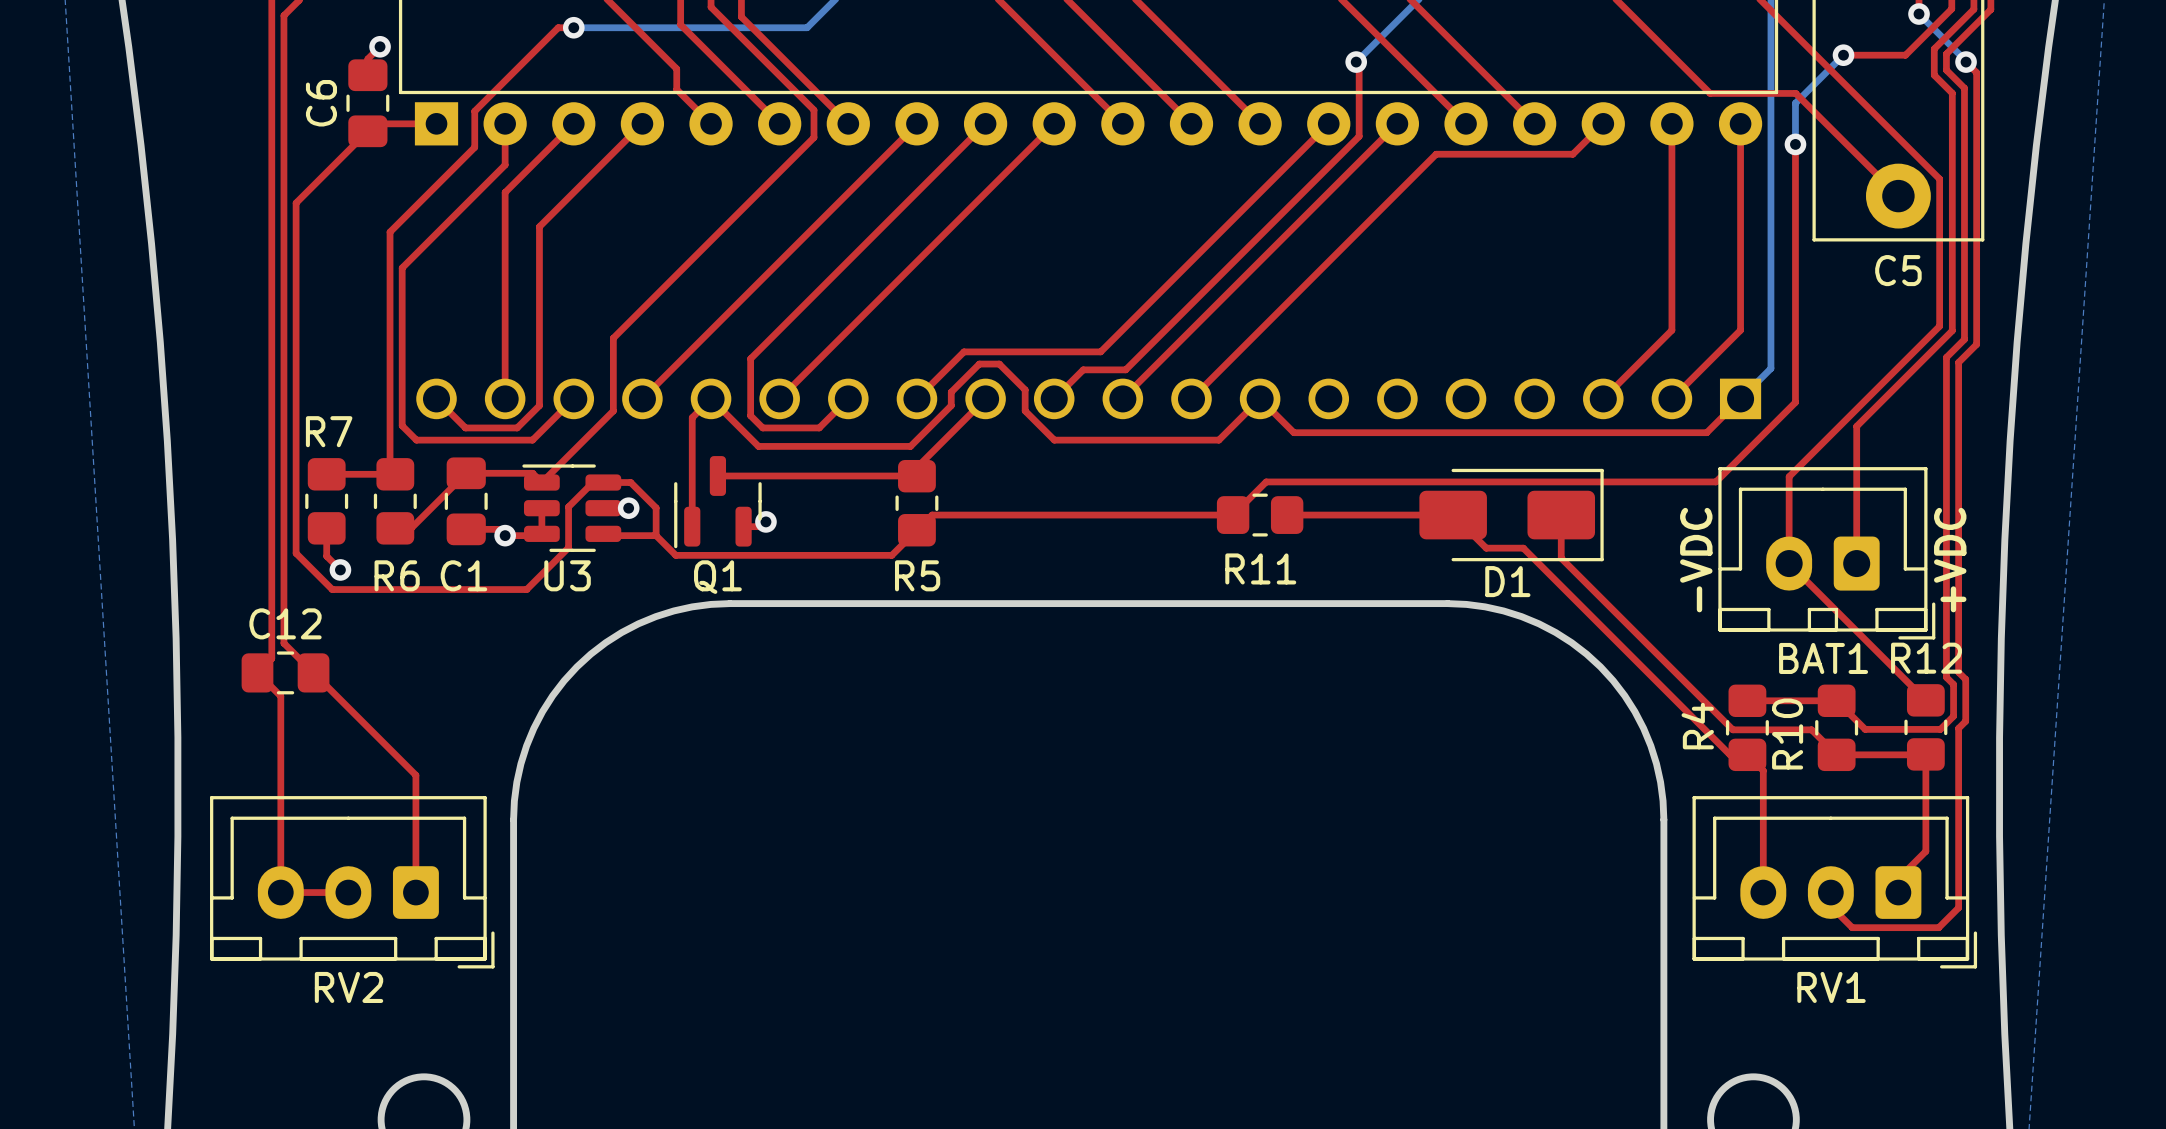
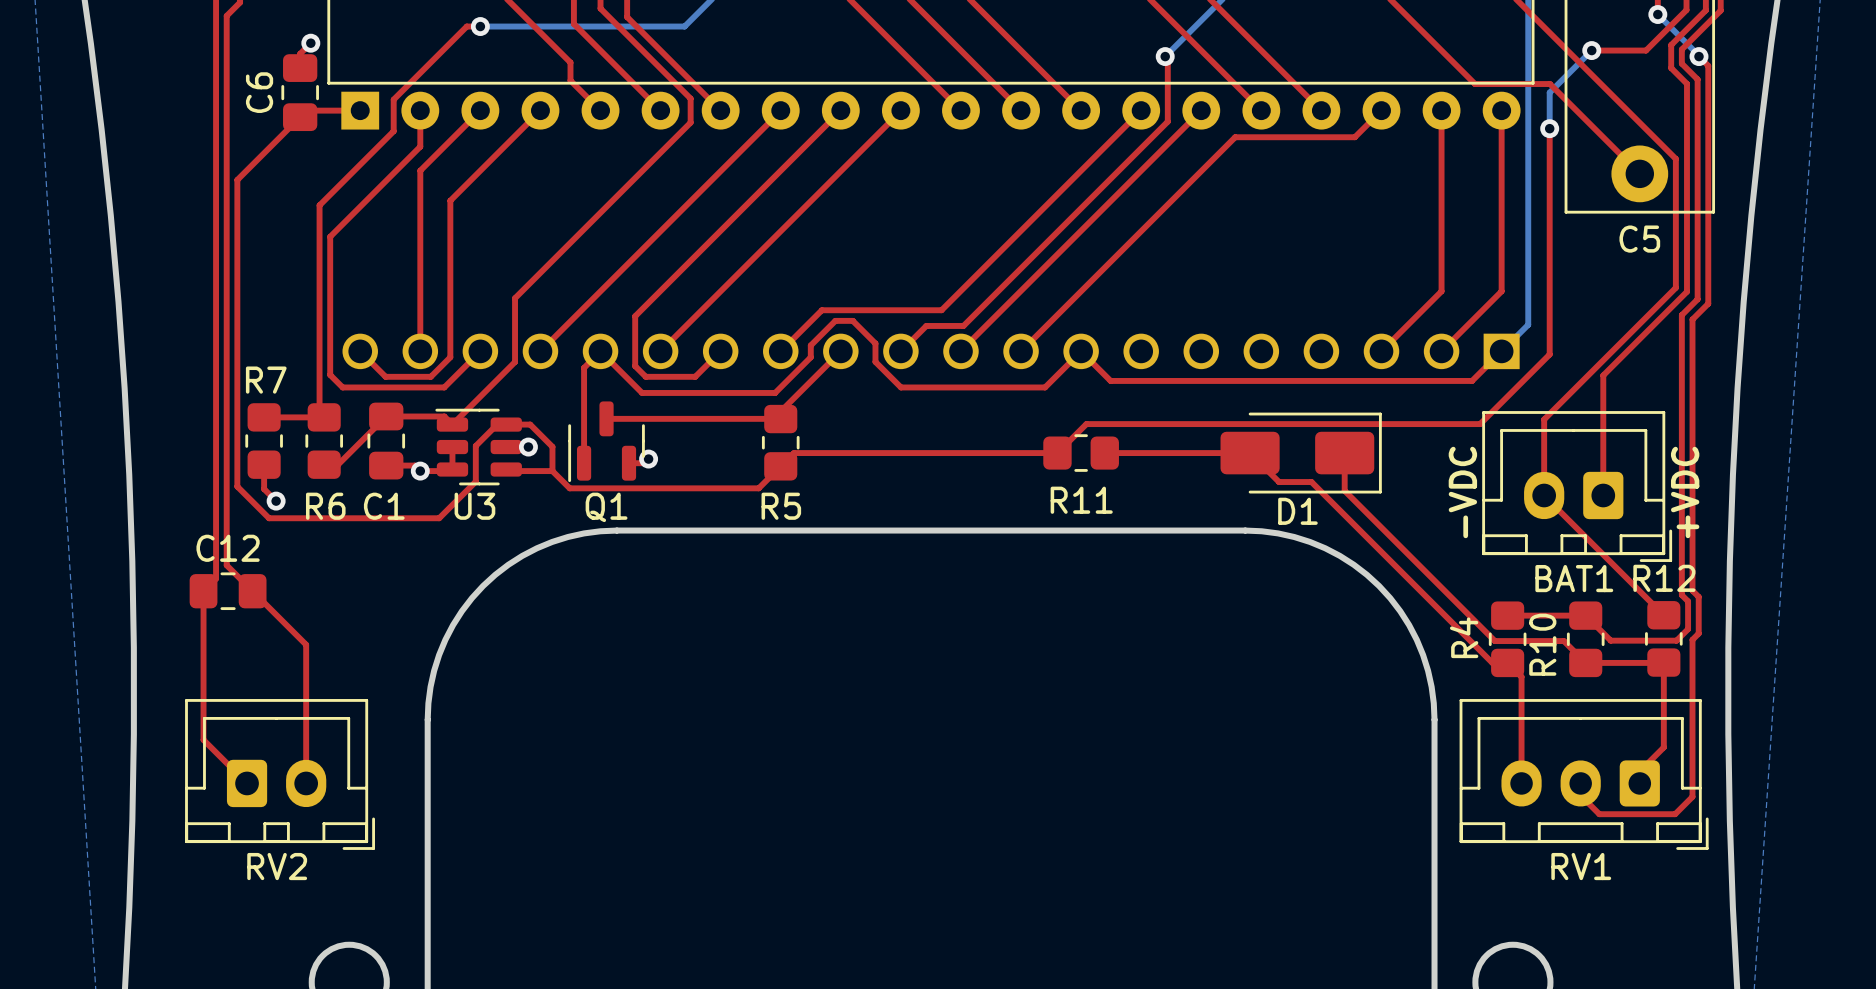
top track: (257, 672) (280, 696) (280, 892) (348, 892) -> (203, 591) (203, 739) (247, 783)
top track: (374, 734) (415, 775) (415, 892) -> (306, 644) (306, 783)
RV2 footprint: [210, 796, 495, 969] -> [185, 699, 375, 850]

